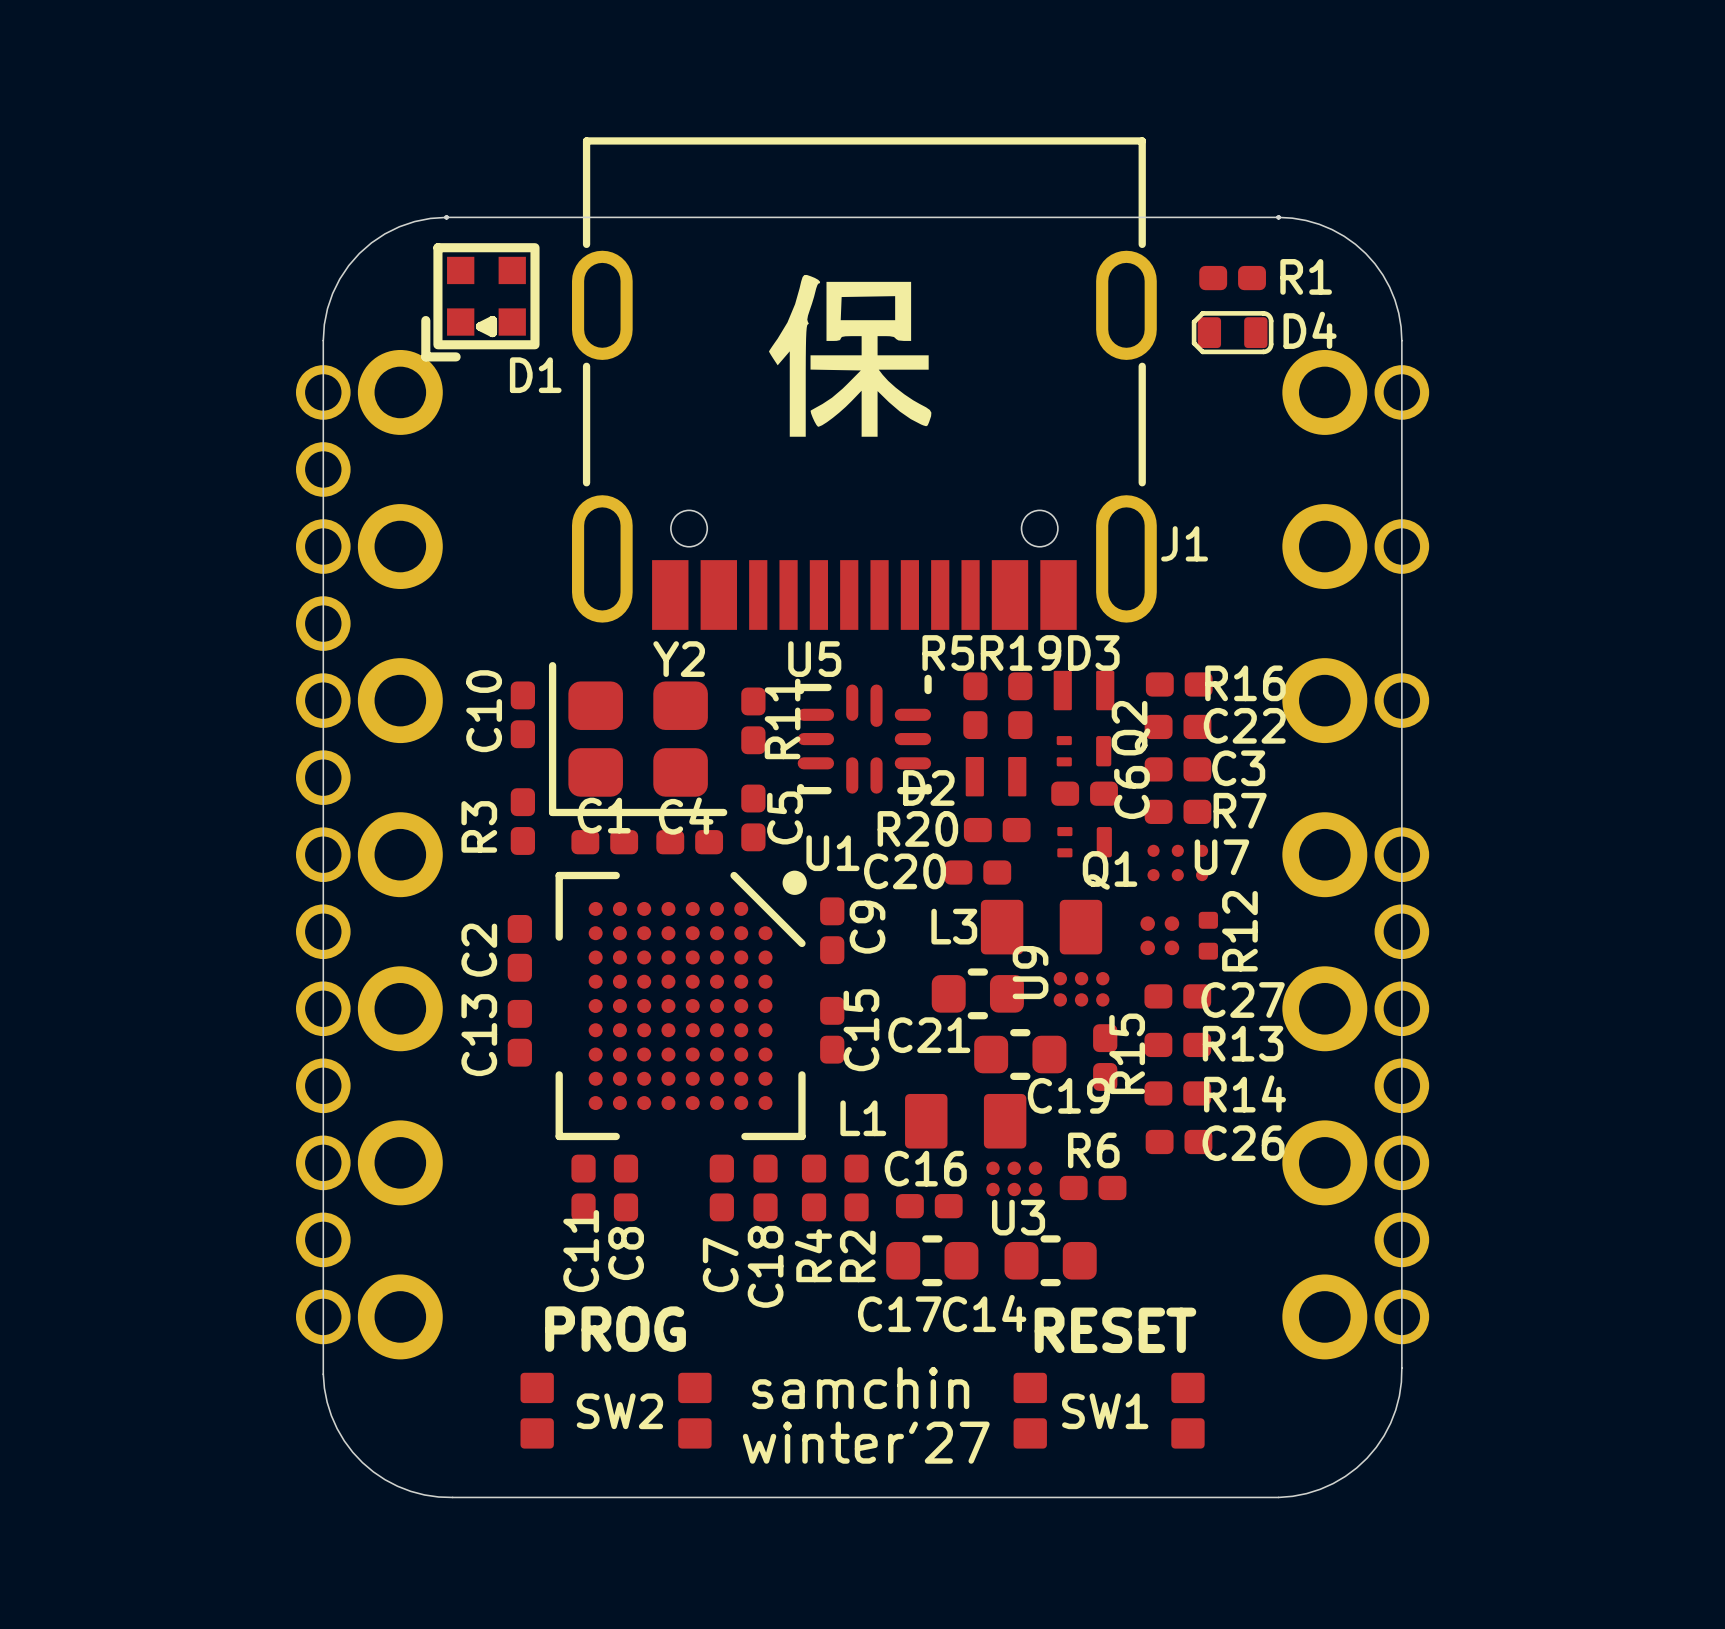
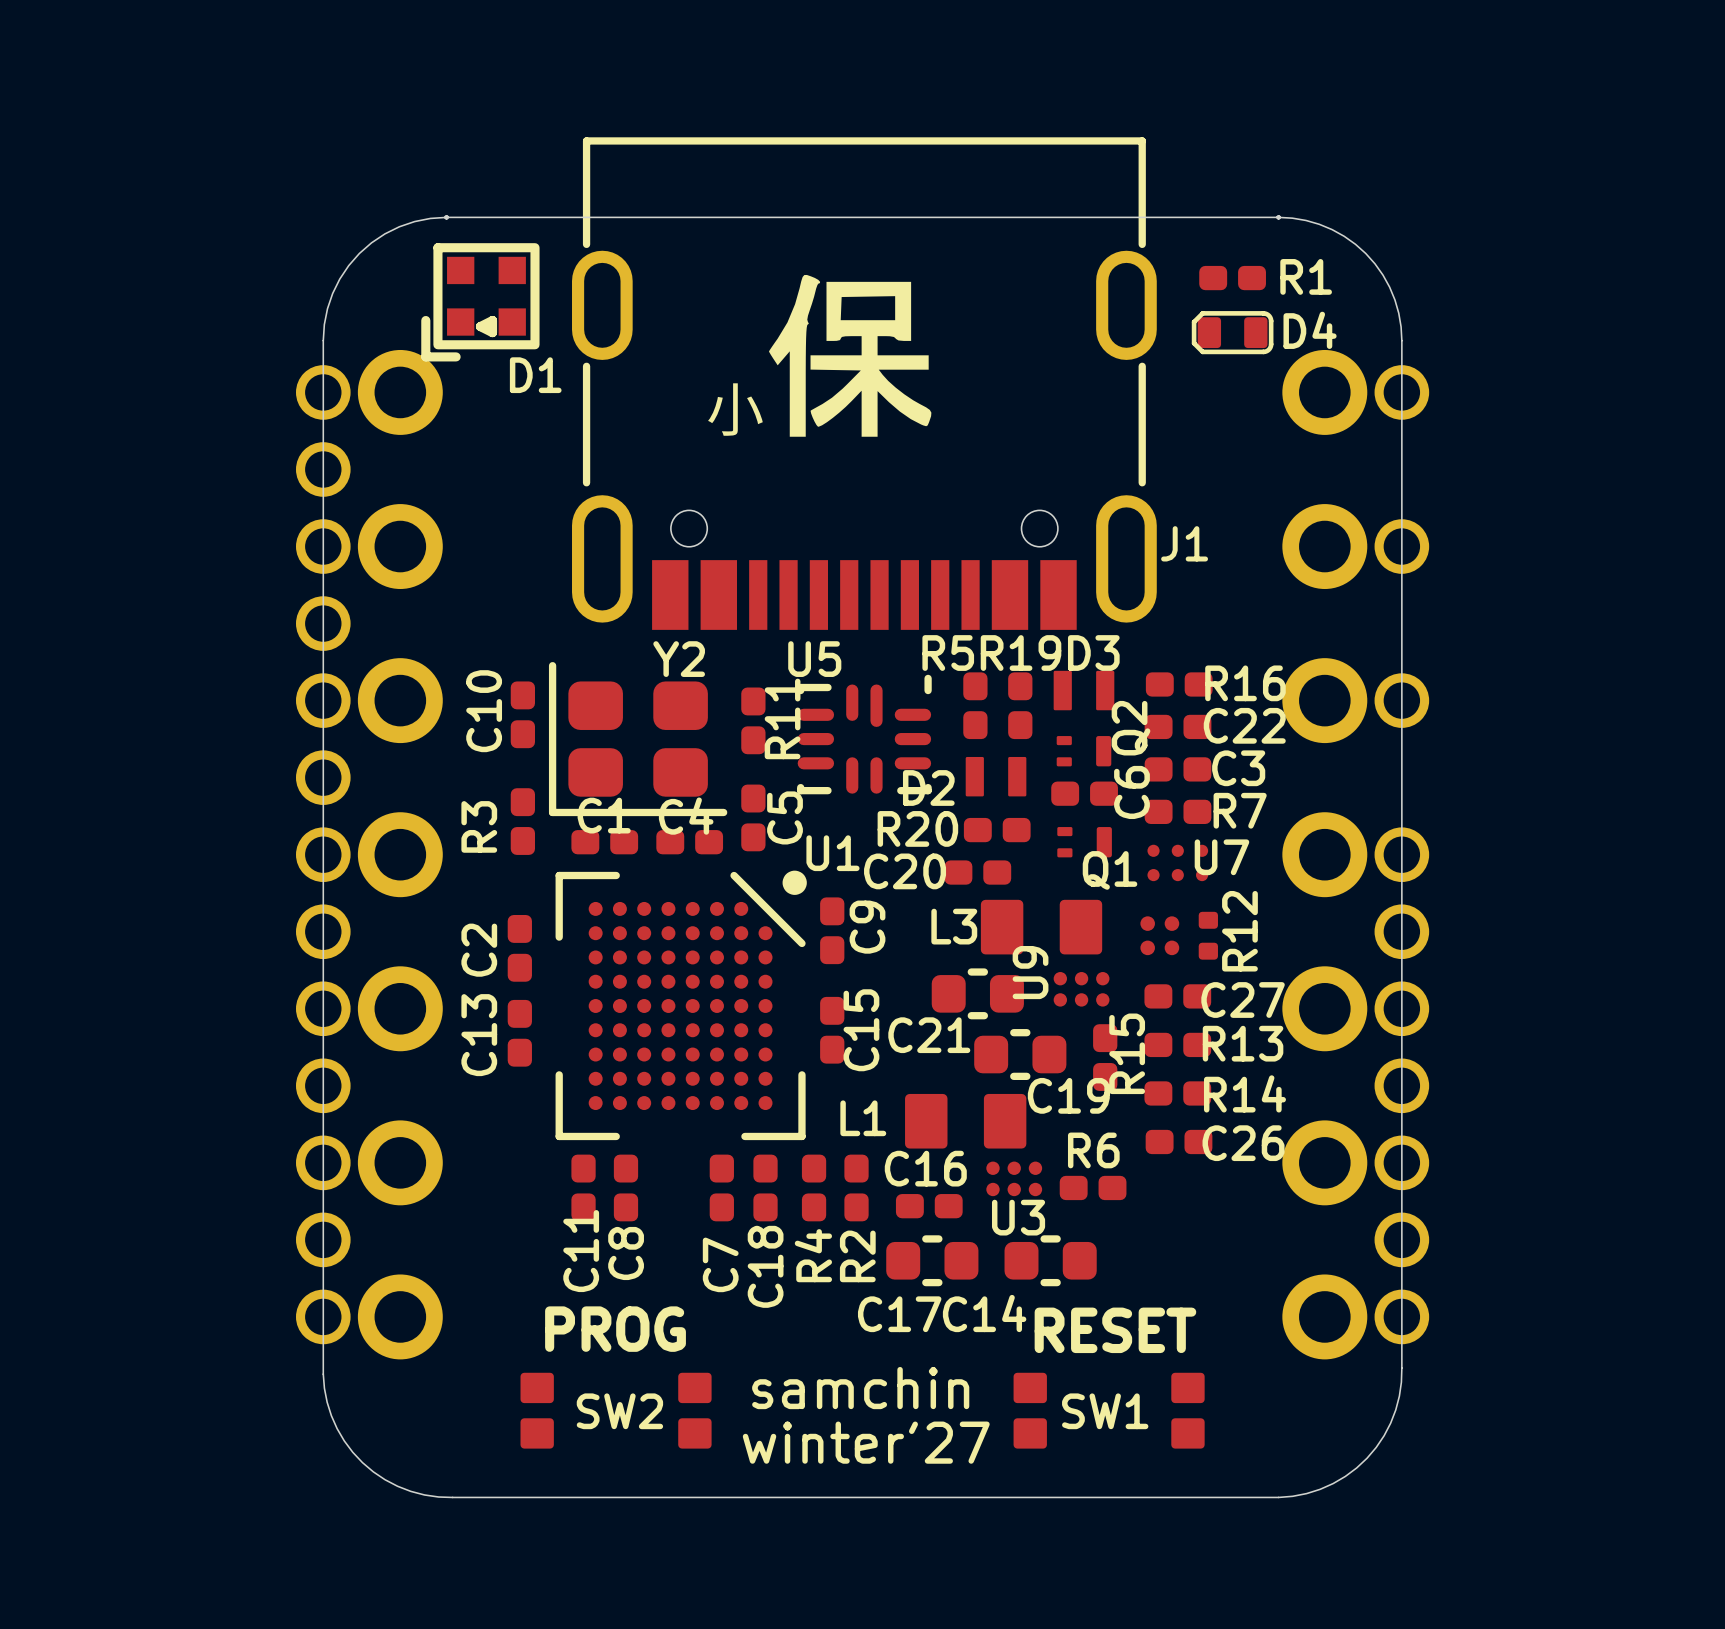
text: none -> 小 (735, 409)

